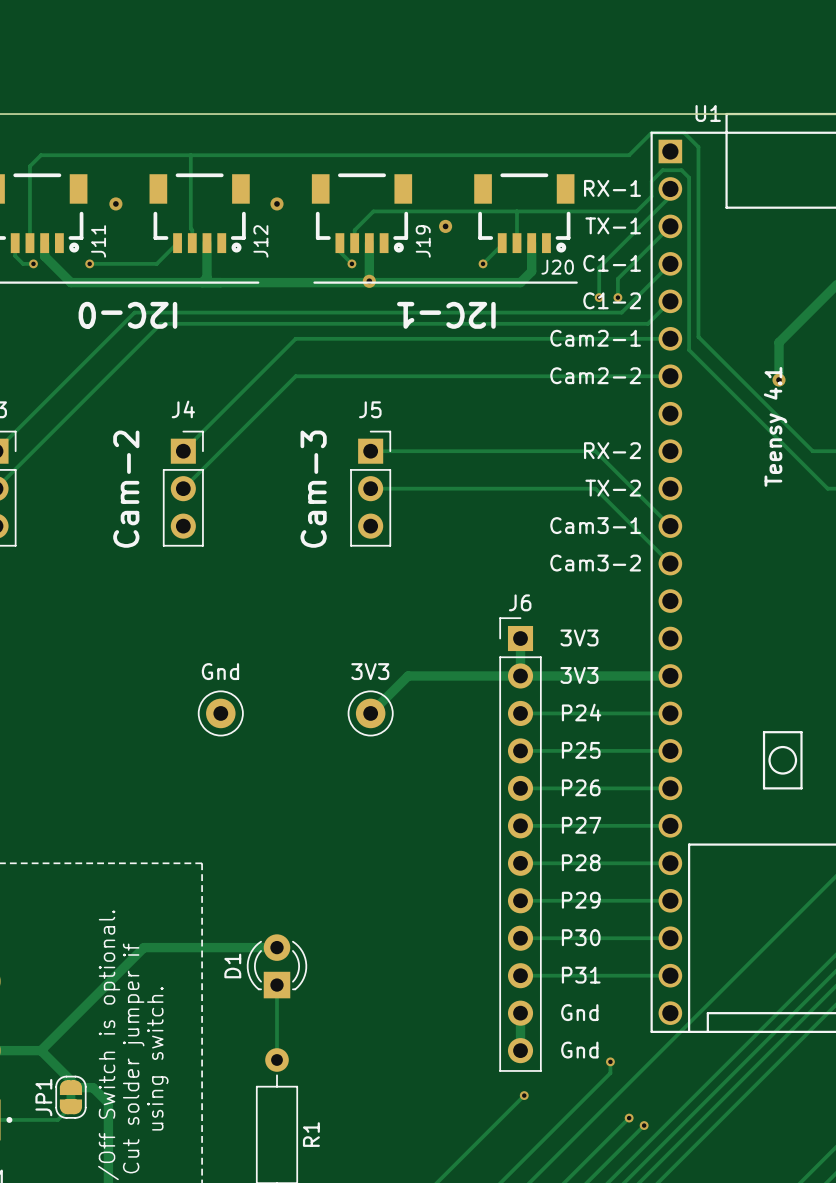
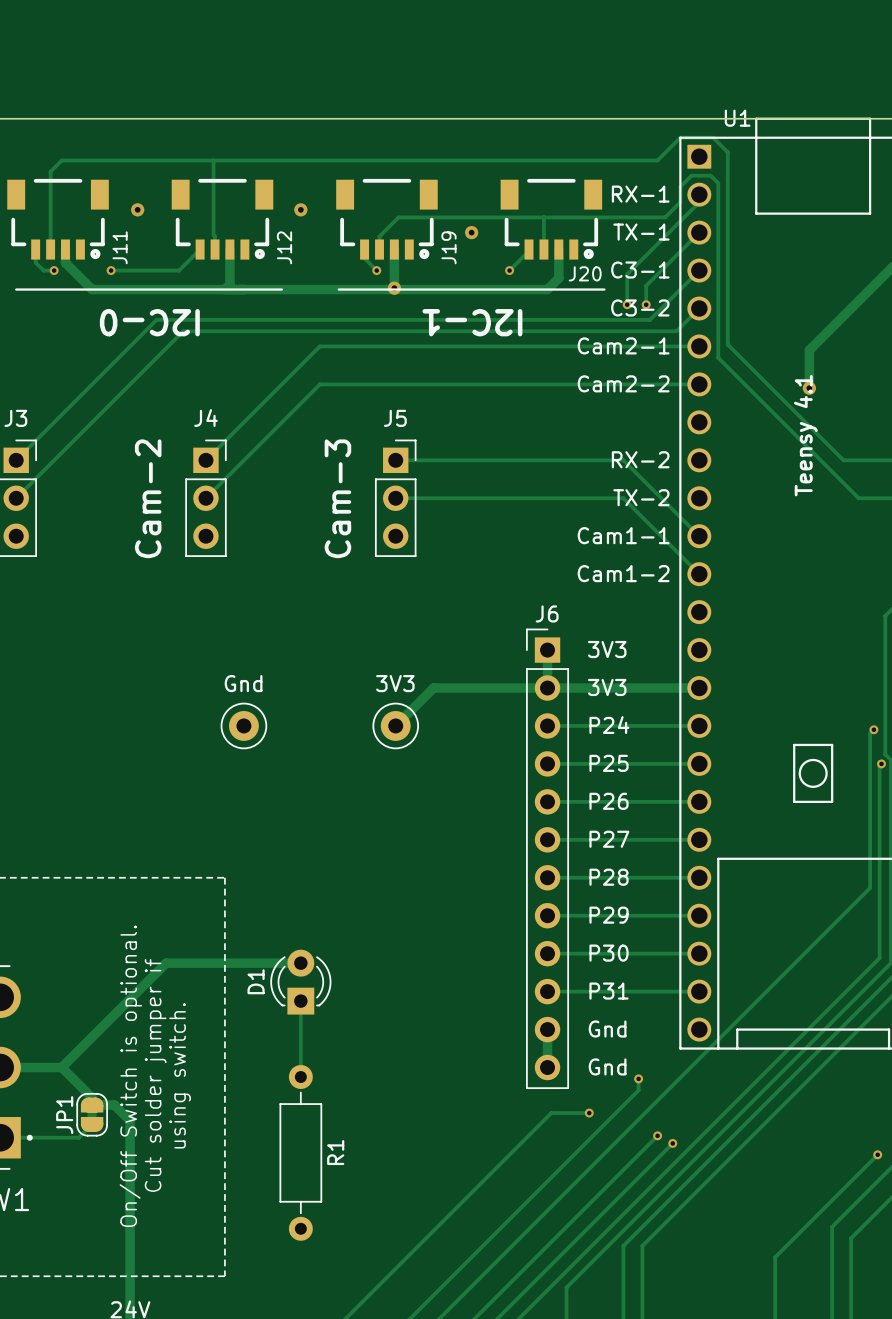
text: C1-1 (612, 263) -> C3-1 (640, 270)
text: C1-2 (612, 300) -> C3-2 (640, 307)
text: Cam3-1 (595, 525) -> Cam1-1 (623, 535)
text: Cam3-2 (595, 563) -> Cam1-2 (623, 573)
track: none -> (551, 1113) (589, 1113)
via position: (524, 1095) -> (589, 1113)

